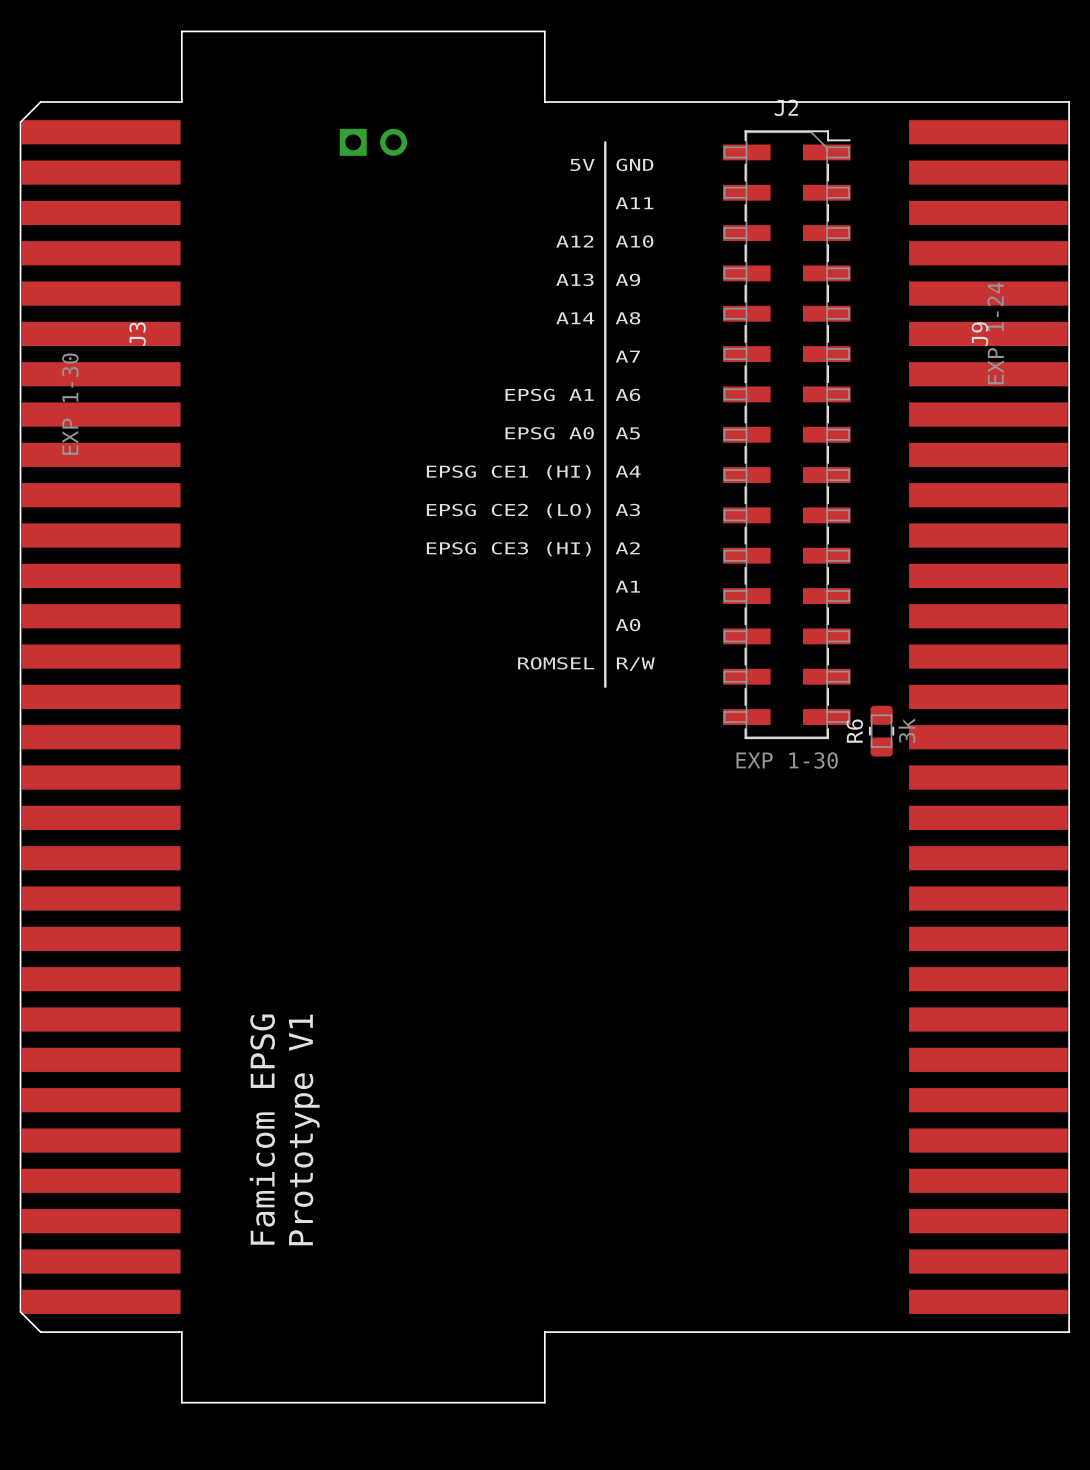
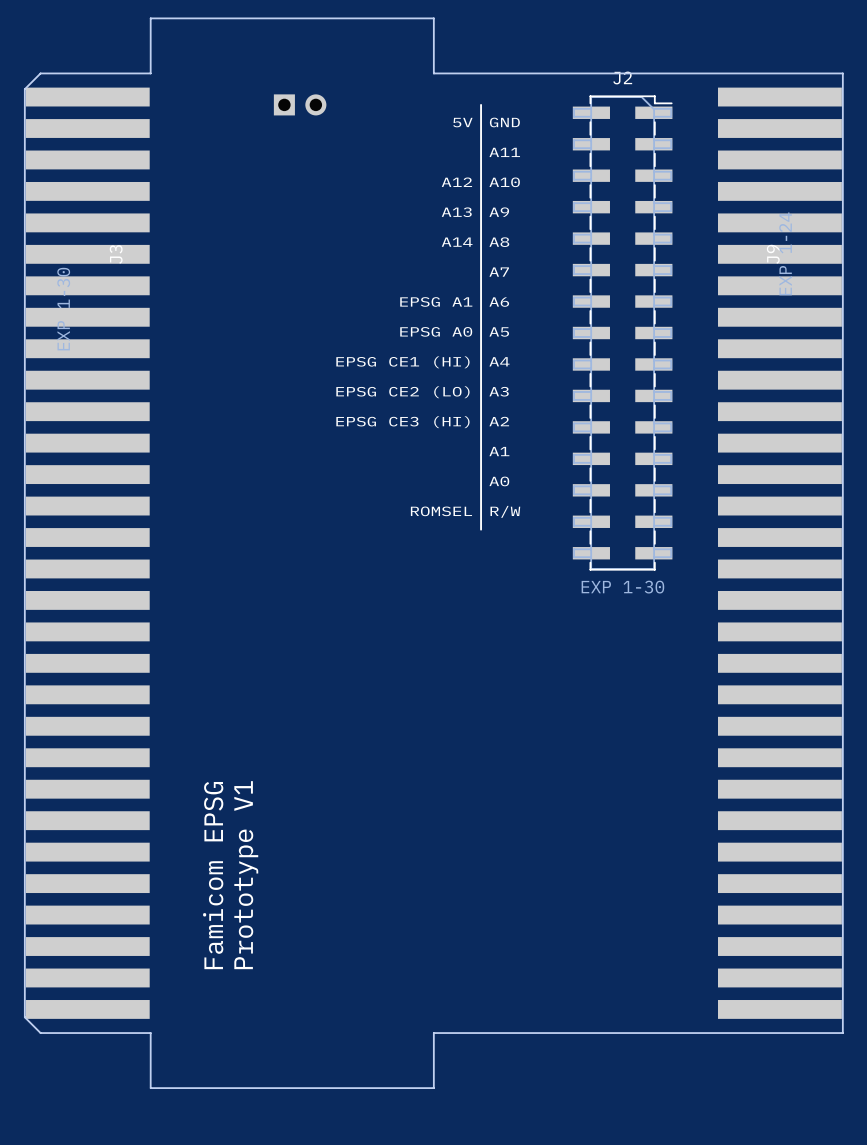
R6: 3k (881, 731) -> none

